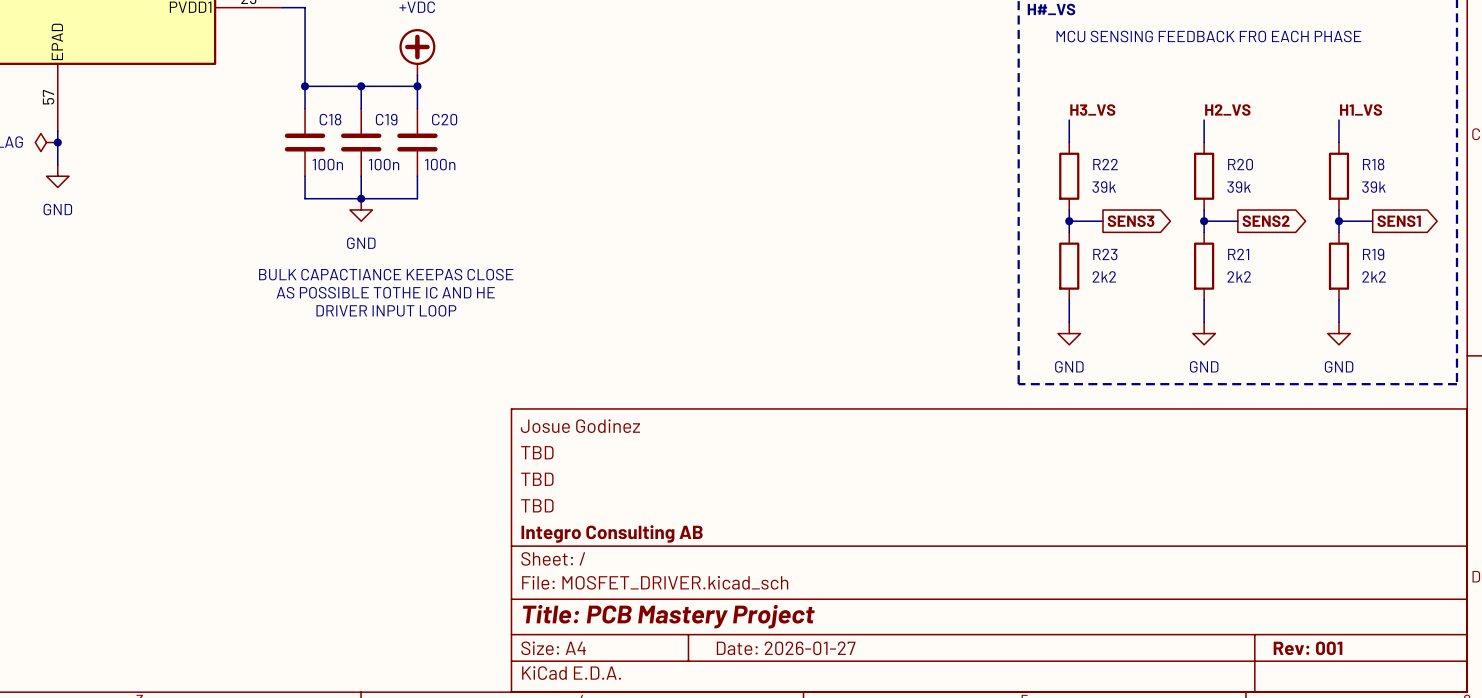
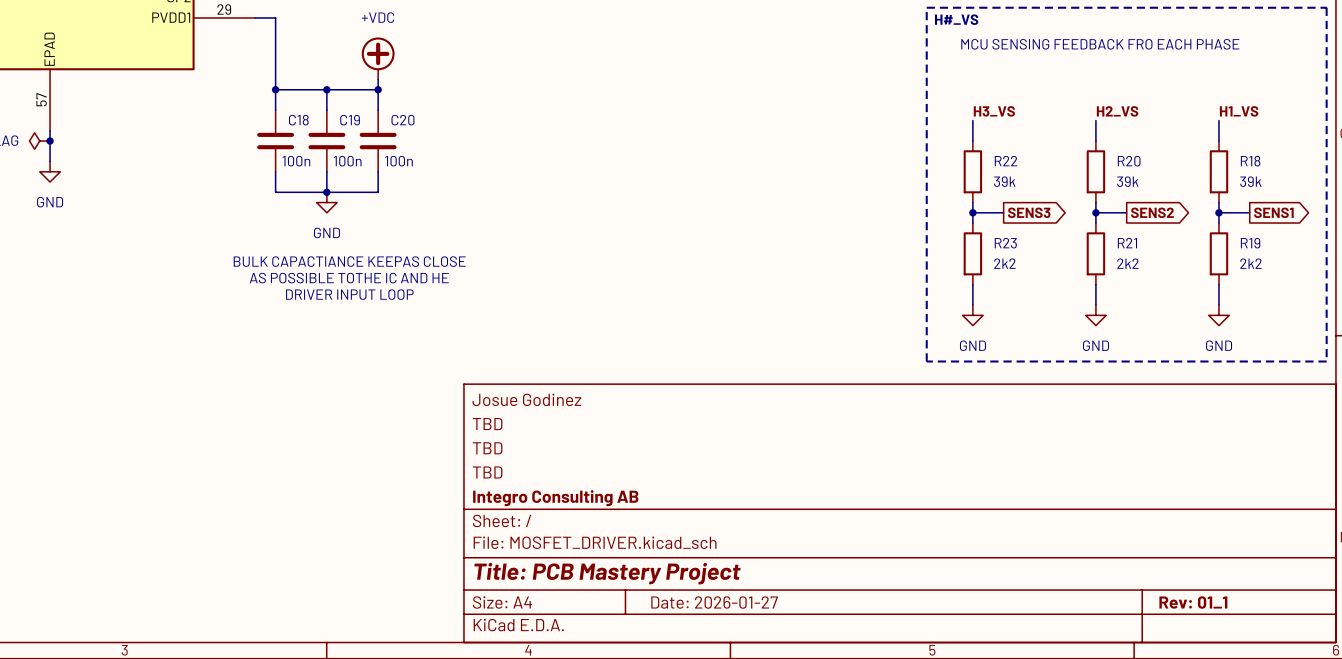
title block: Rev: 001 (1308, 648) -> Rev: 01_1 (1193, 602)

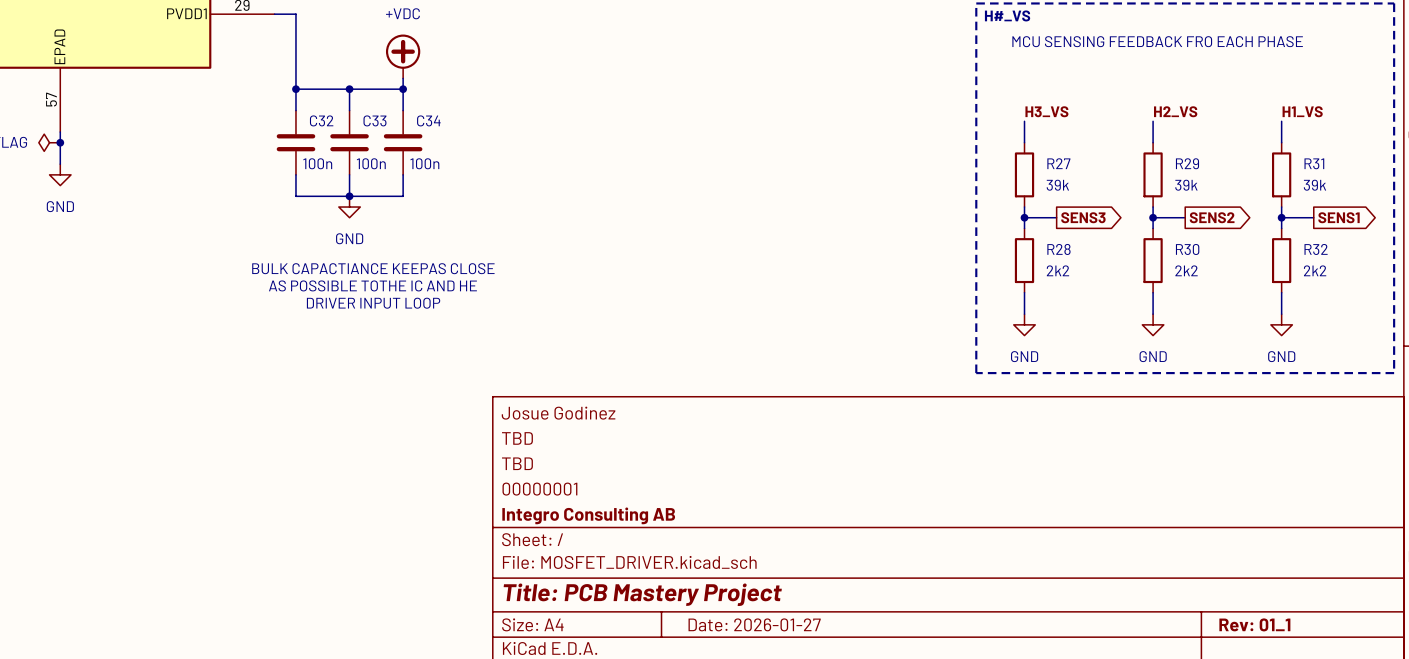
C18 name: C18 (298, 120) -> C32 (321, 120)
C19 name: C19 (350, 120) -> C33 (374, 120)
C20 name: C20 (402, 120) -> C34 (428, 120)
R22 name: R22 (1005, 161) -> R27 (1058, 163)
R20 name: R20 (1129, 161) -> R29 (1187, 163)
R18 name: R18 (1250, 161) -> R31 (1314, 163)
R23 name: R23 (1005, 243) -> R28 (1058, 249)
R21 name: R21 (1127, 243) -> R30 (1187, 249)
R19 name: R19 (1250, 243) -> R32 (1316, 249)
title block: TBD (487, 472) -> 00000001 (539, 489)

